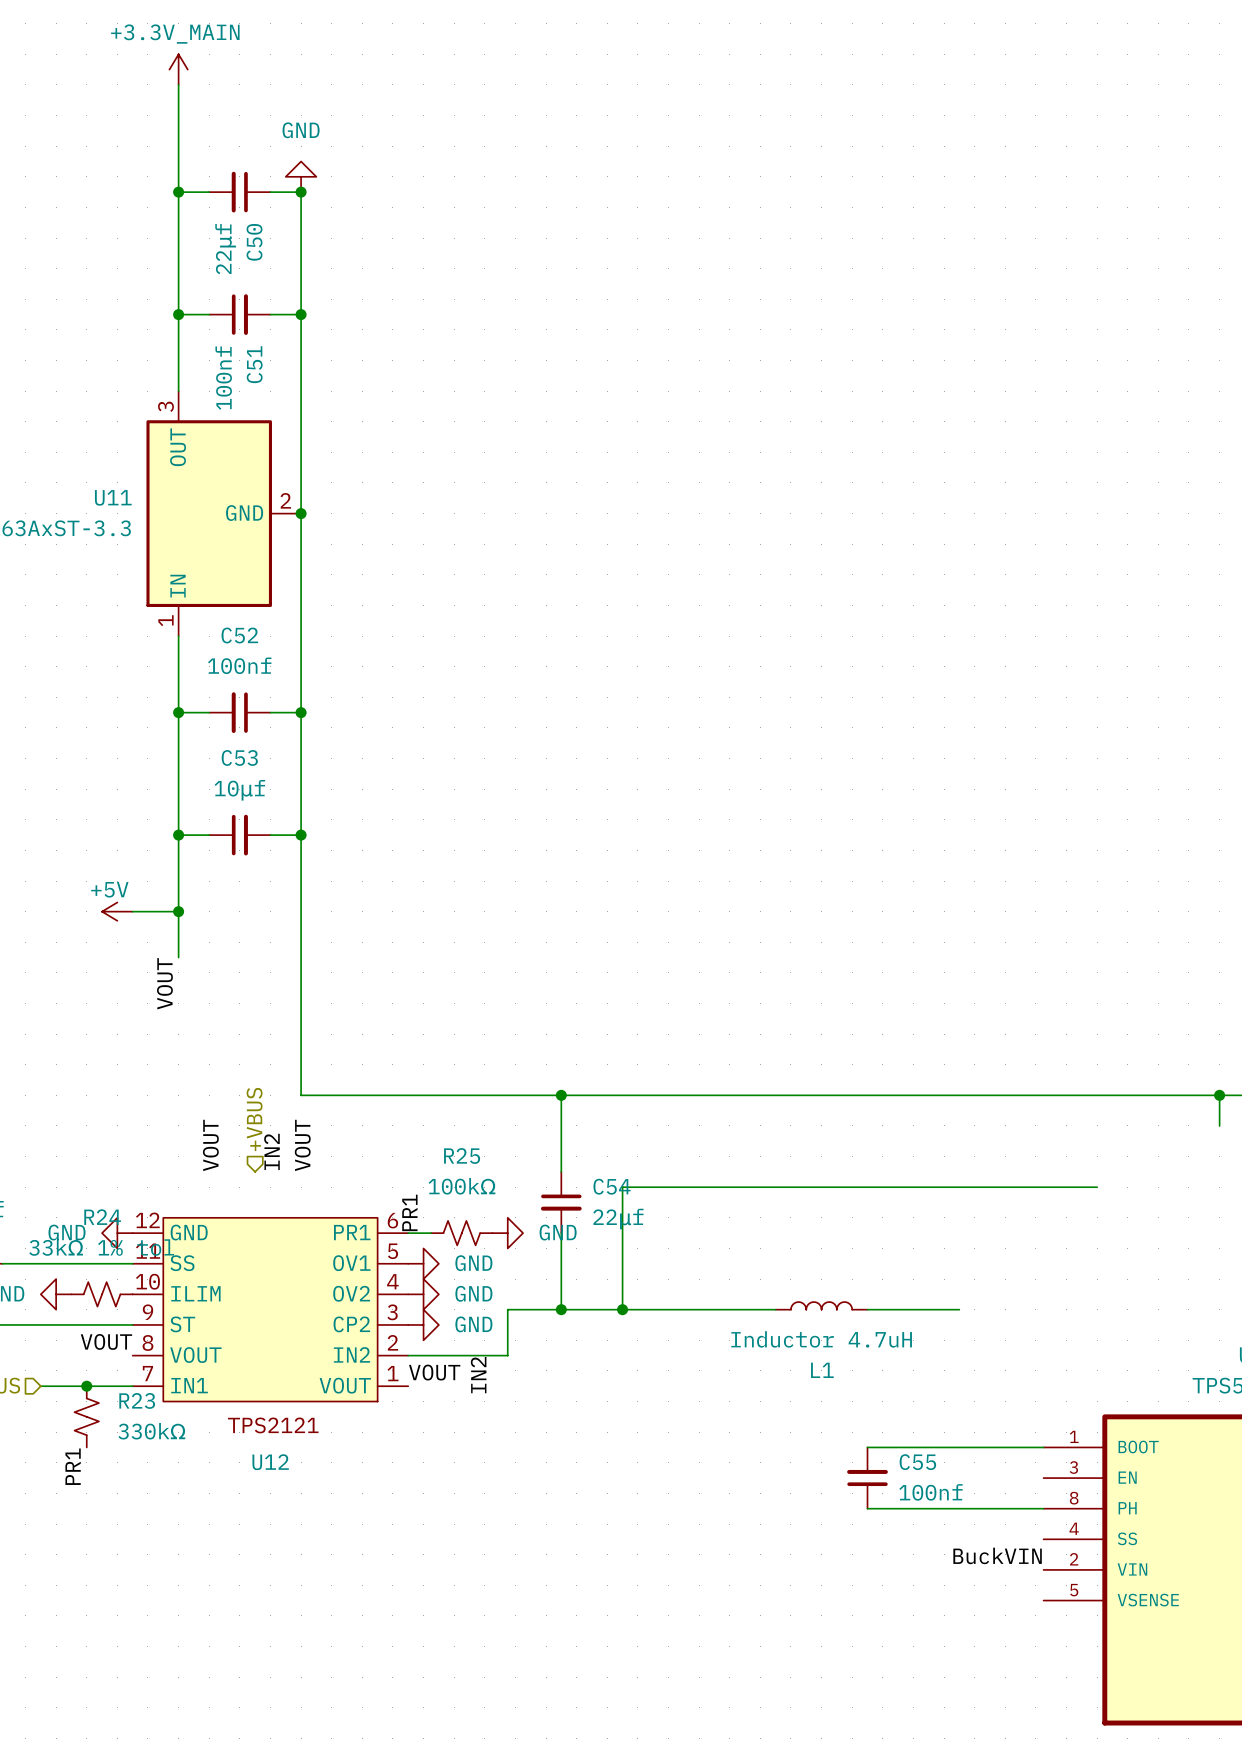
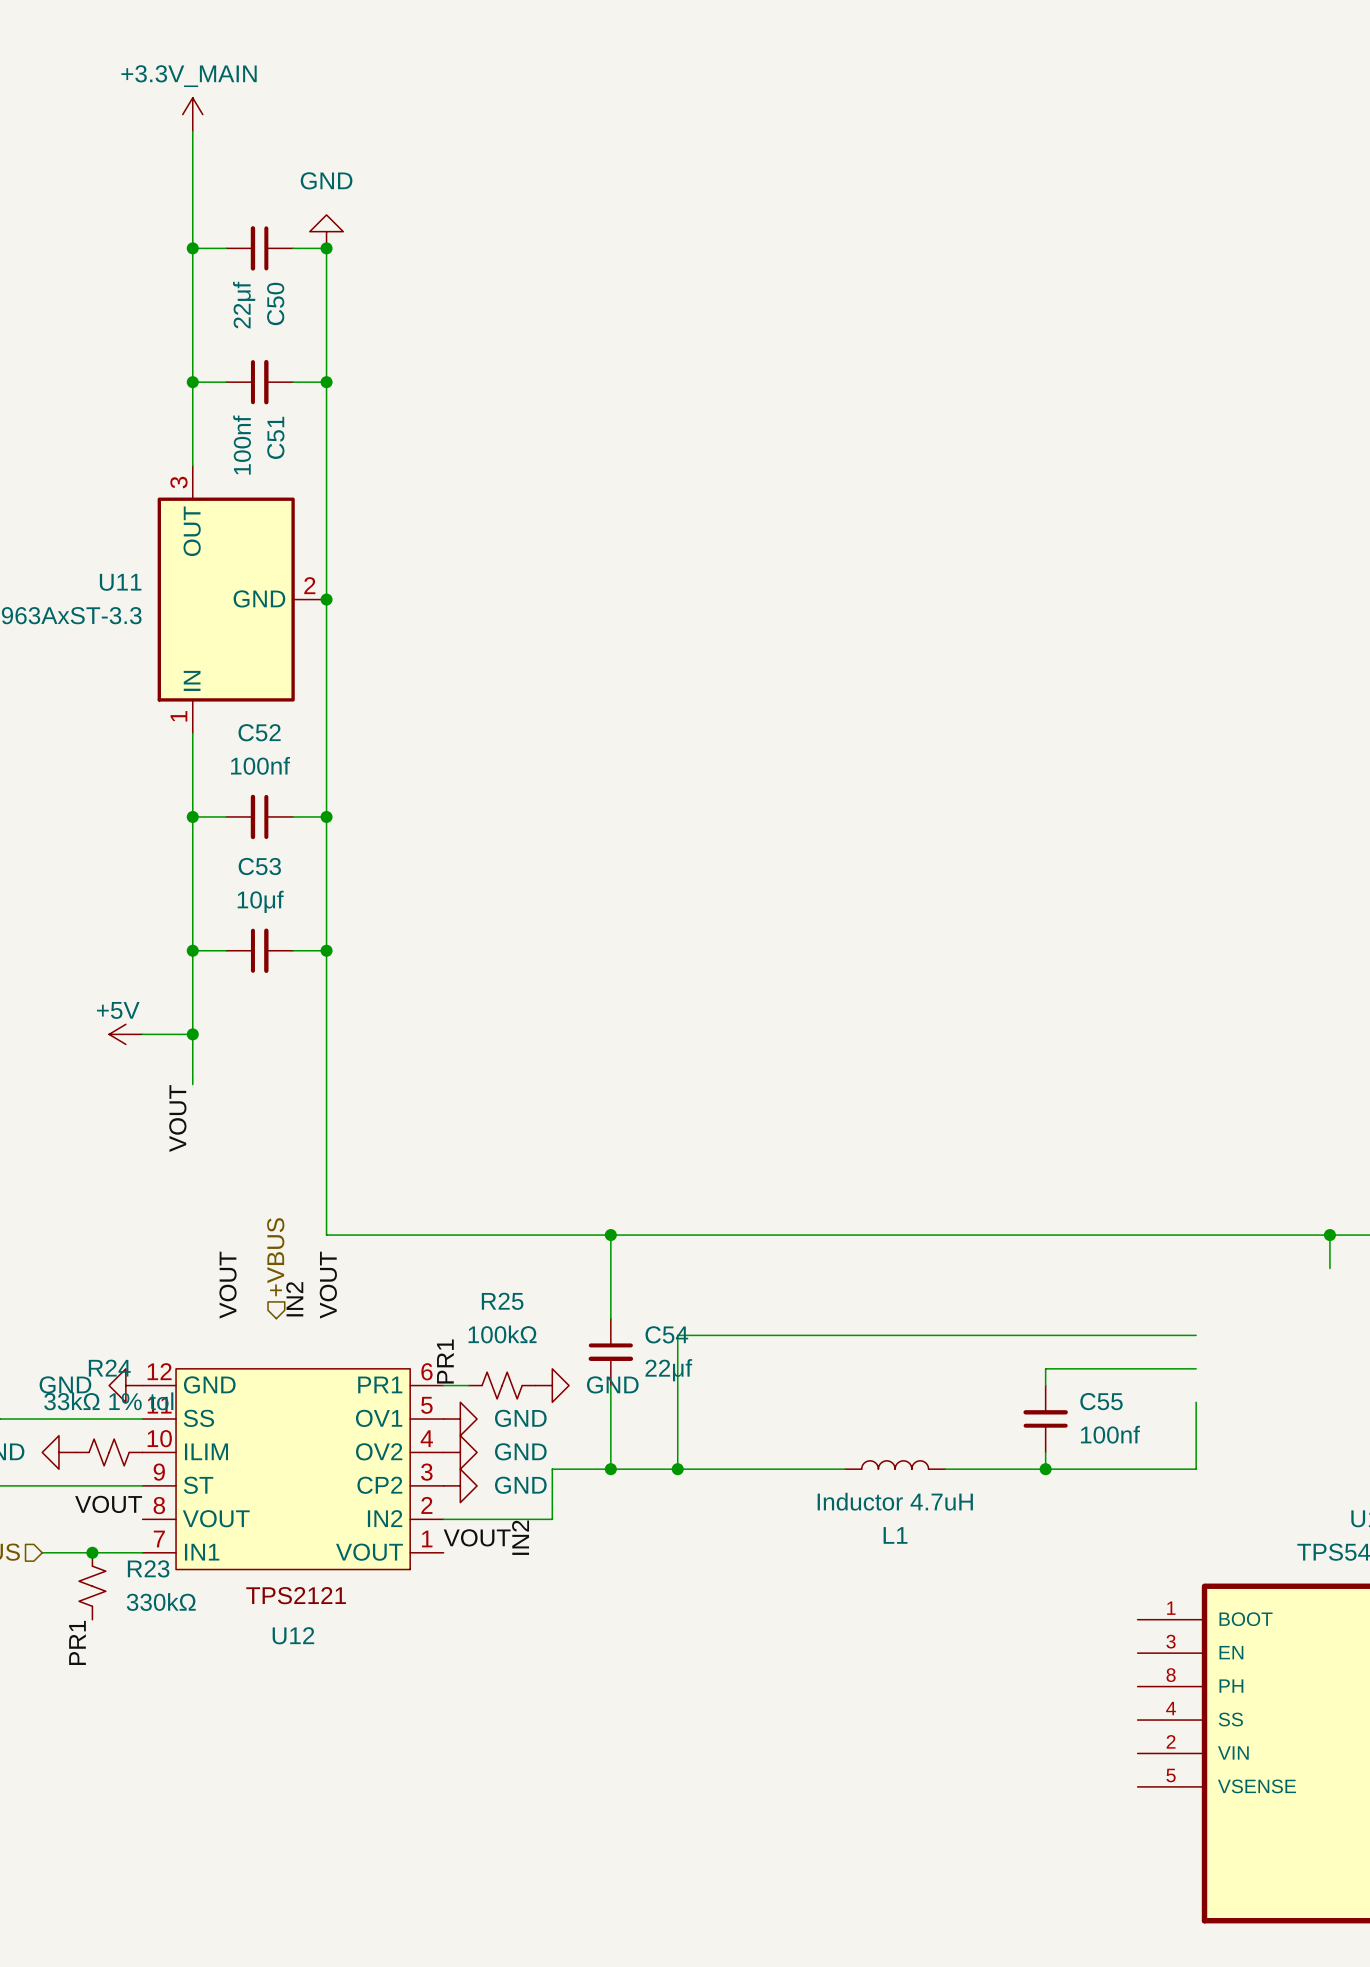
wire: none -> (1196, 1368) (1045, 1368) (1045, 1385)
wire: none -> (1196, 1402) (1196, 1469) (1045, 1469) (1045, 1452)
junction: none -> (1045, 1469)
wire: (867, 1447) (1043, 1447) -> none
C55 position: (867, 1478) -> (1045, 1419)
wire: (867, 1508) (1043, 1508) -> none
label: BuckVIN (997, 1555) -> none

